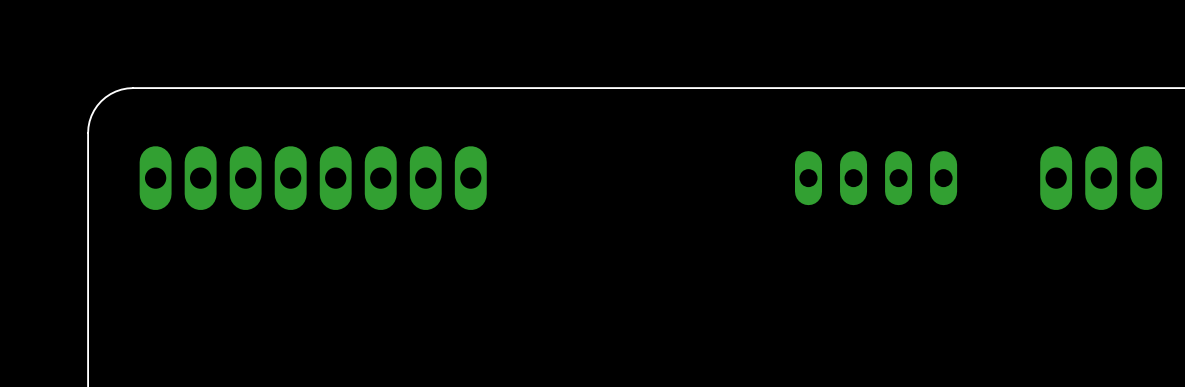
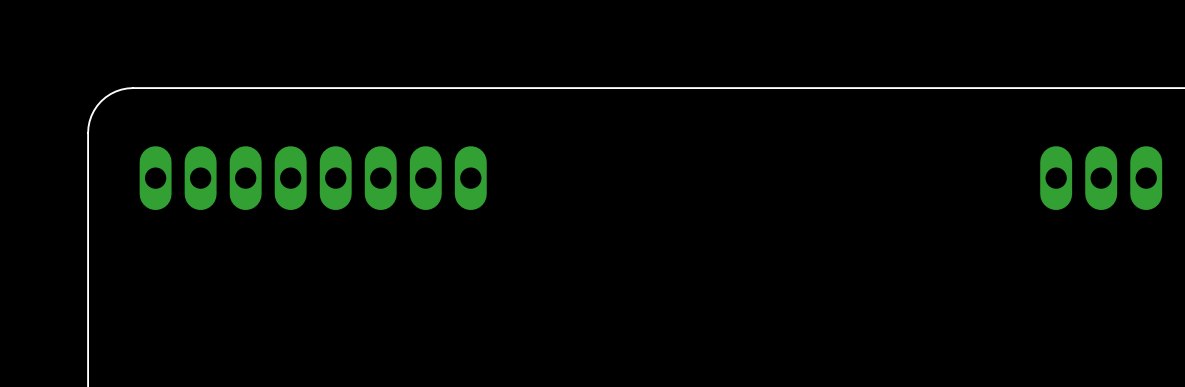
part: (876, 178) -> none

